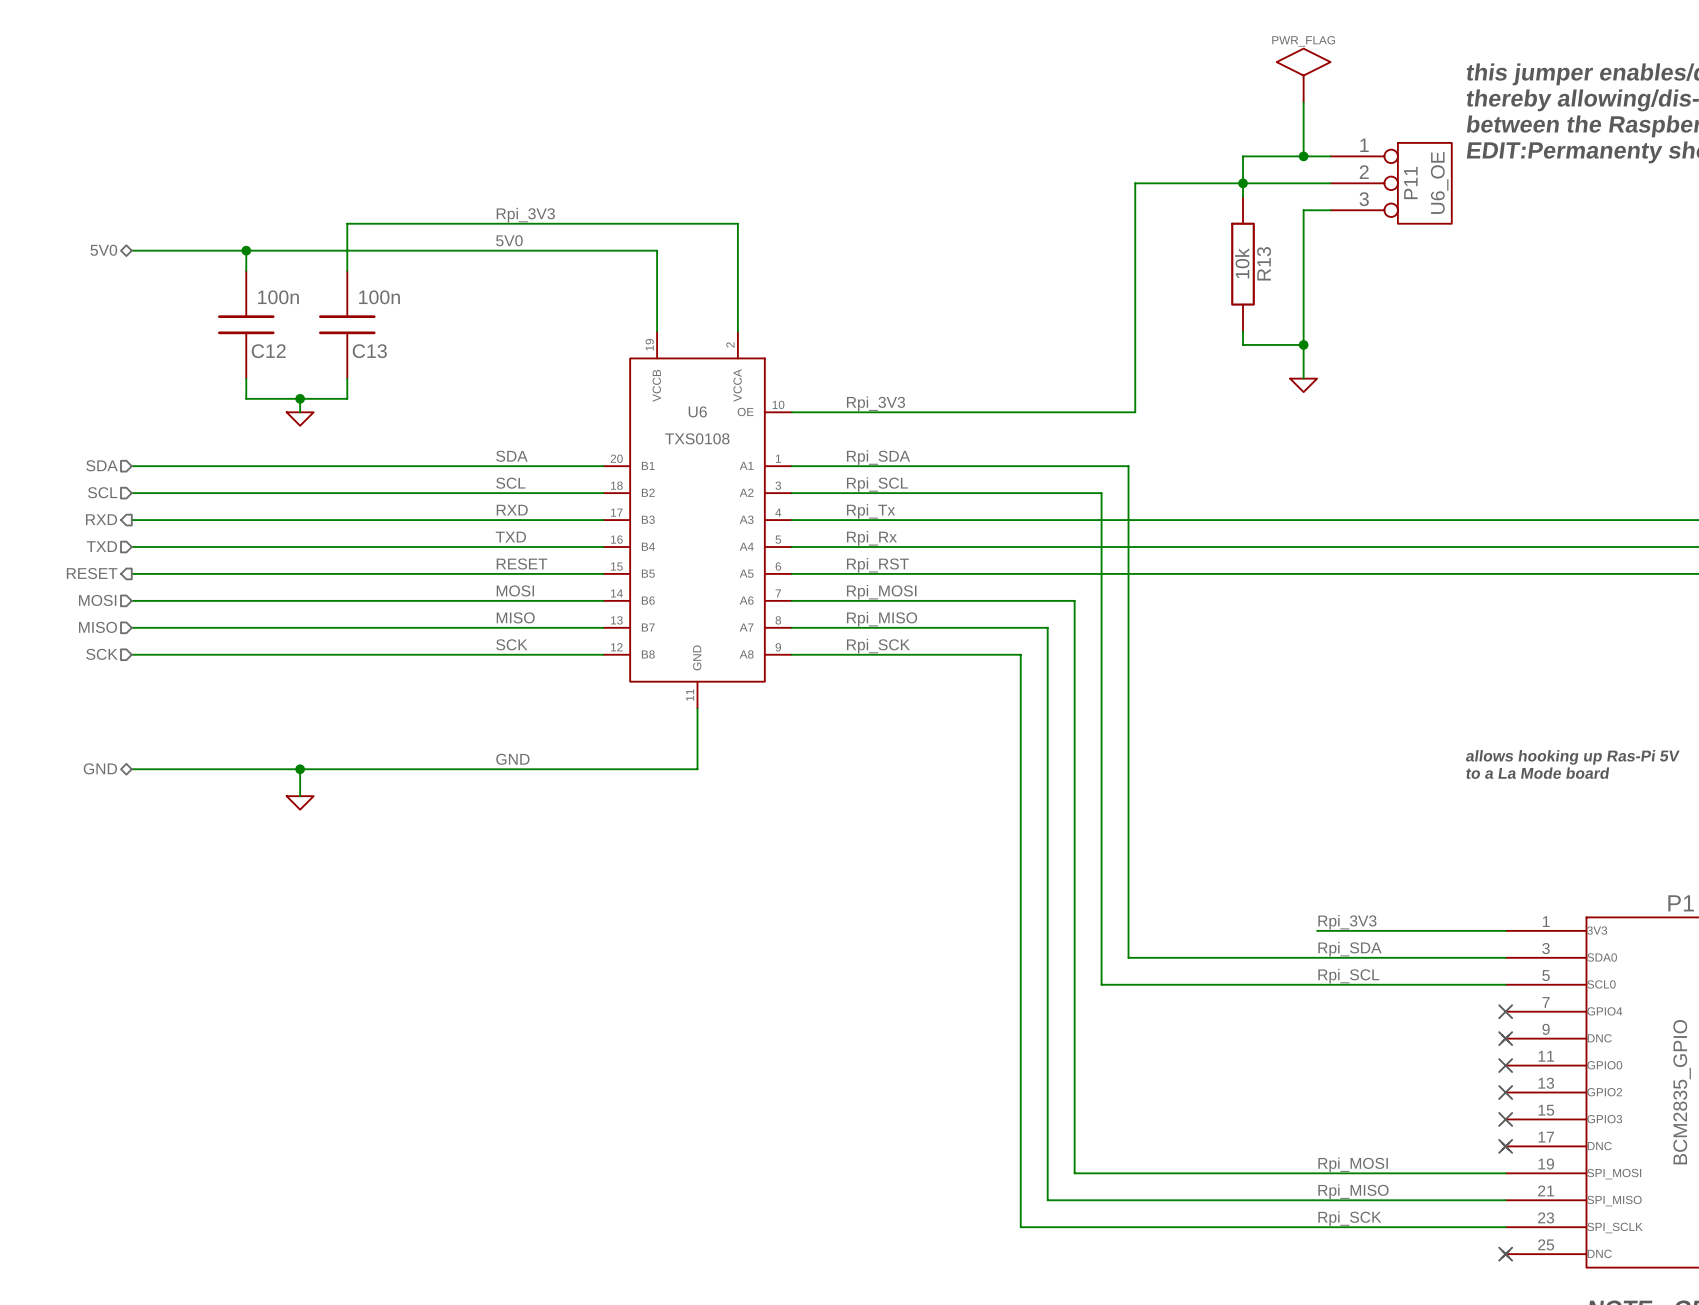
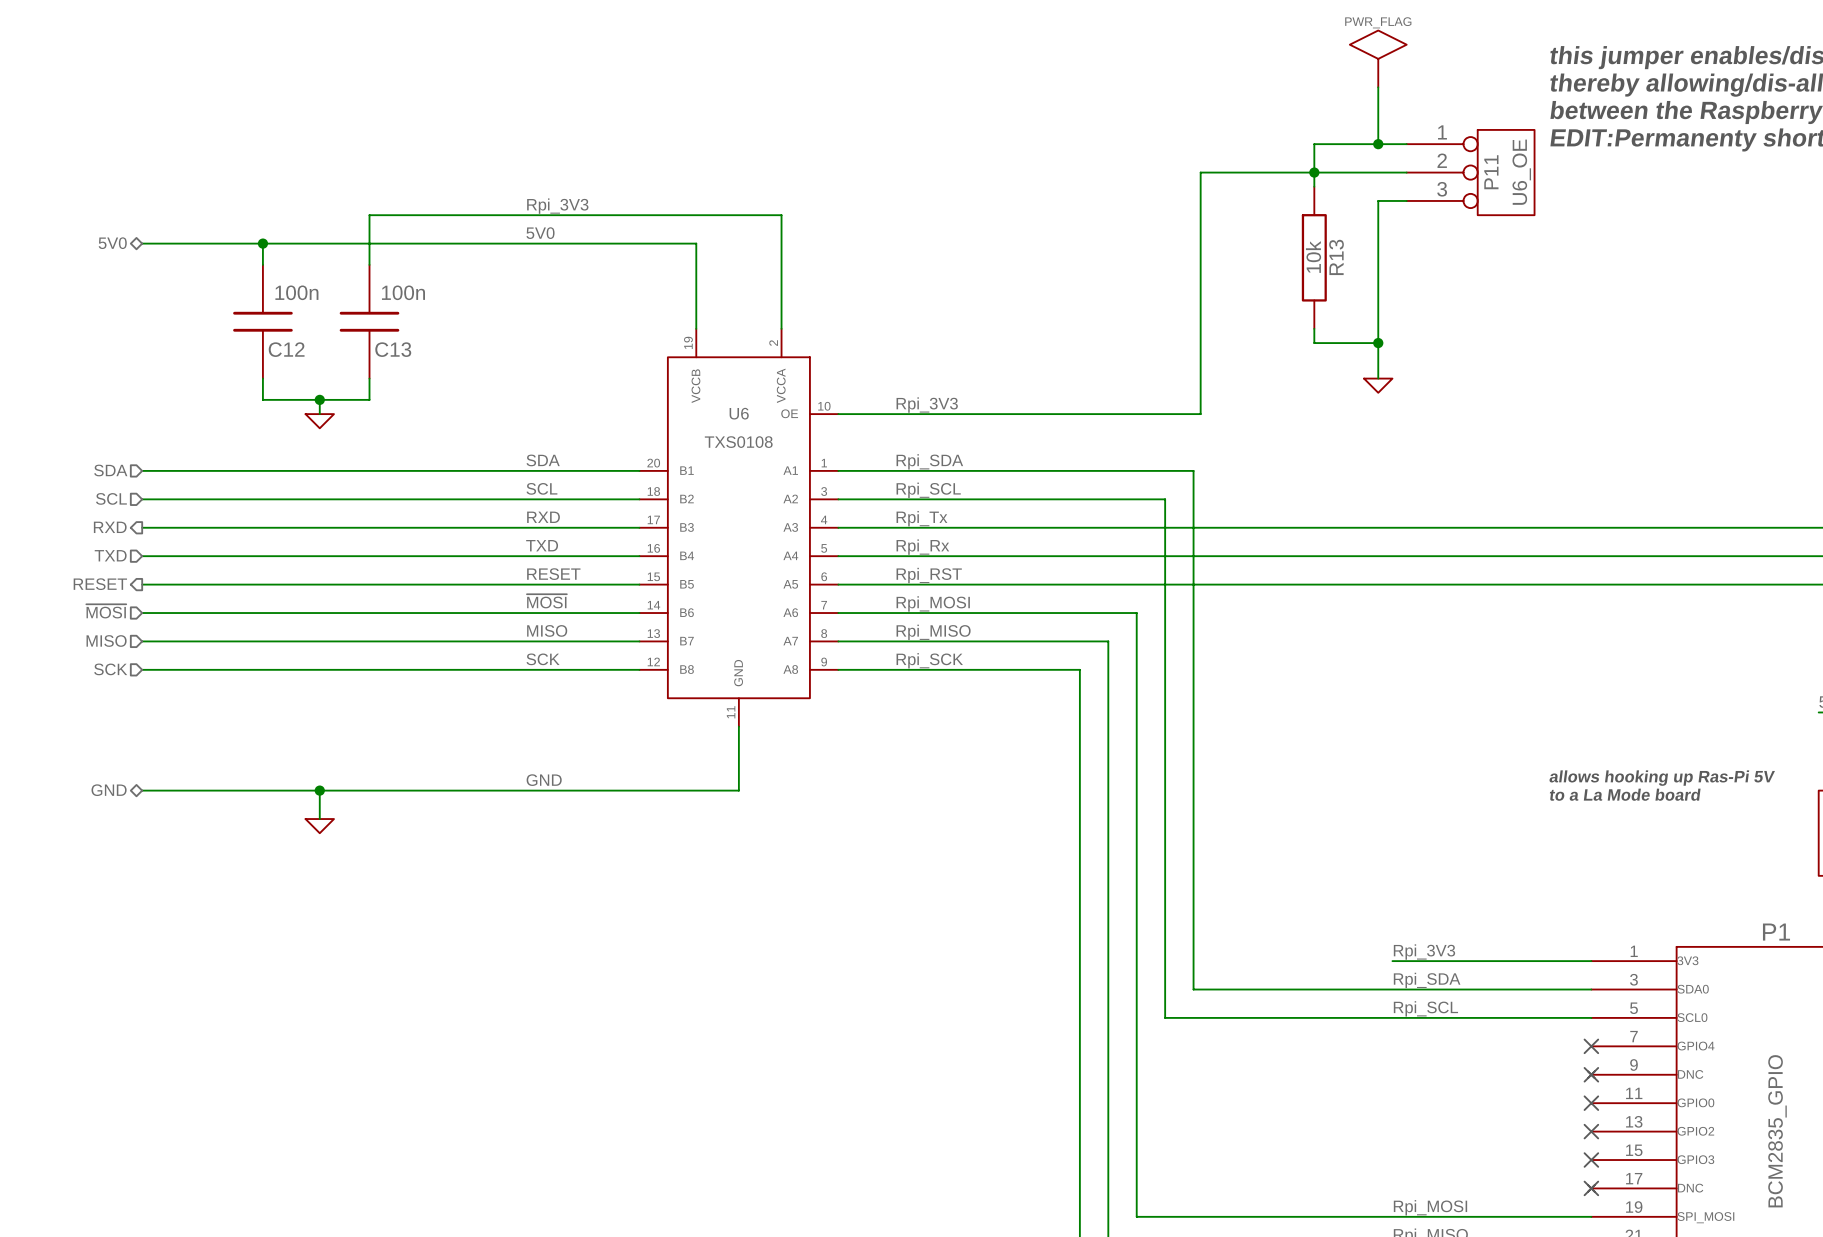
label: MOSI (515, 590) -> ~{MOSI} (546, 601)
hierarchical label: MOSI (97, 600) -> ~{MOSI} (106, 611)

